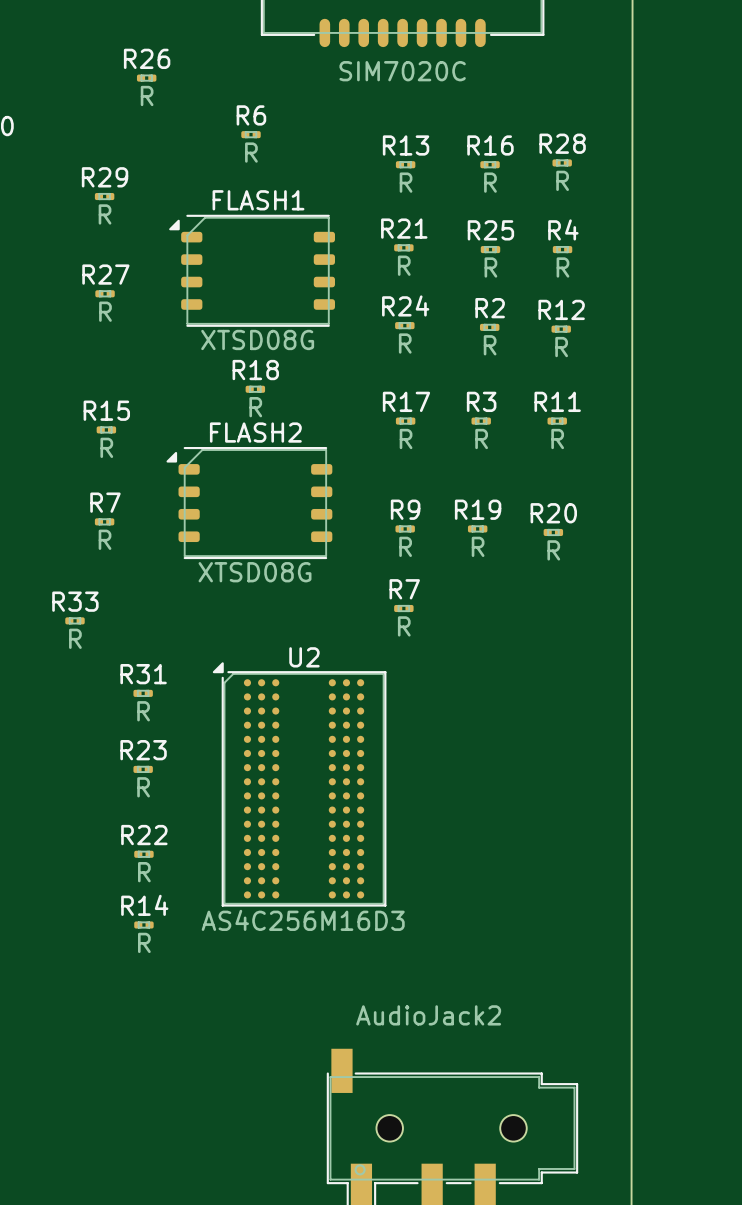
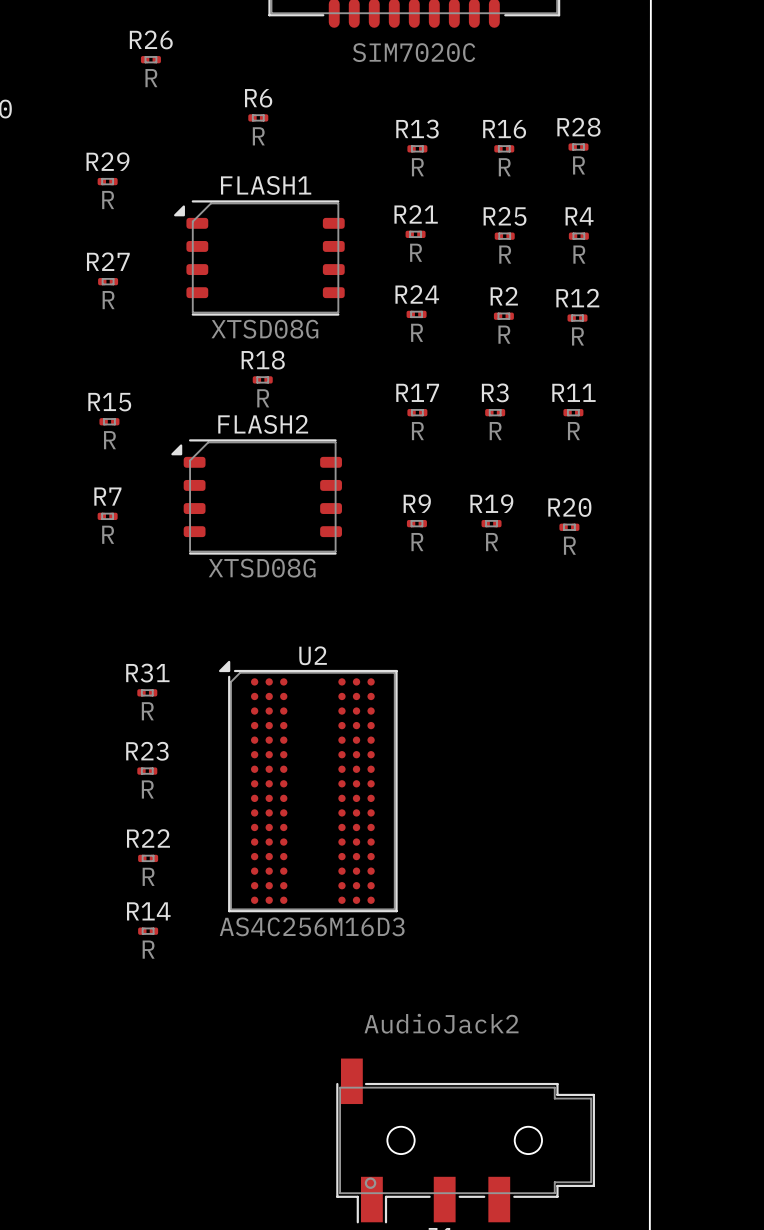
R7: R (403, 608) -> none
R33: R (74, 620) -> none

